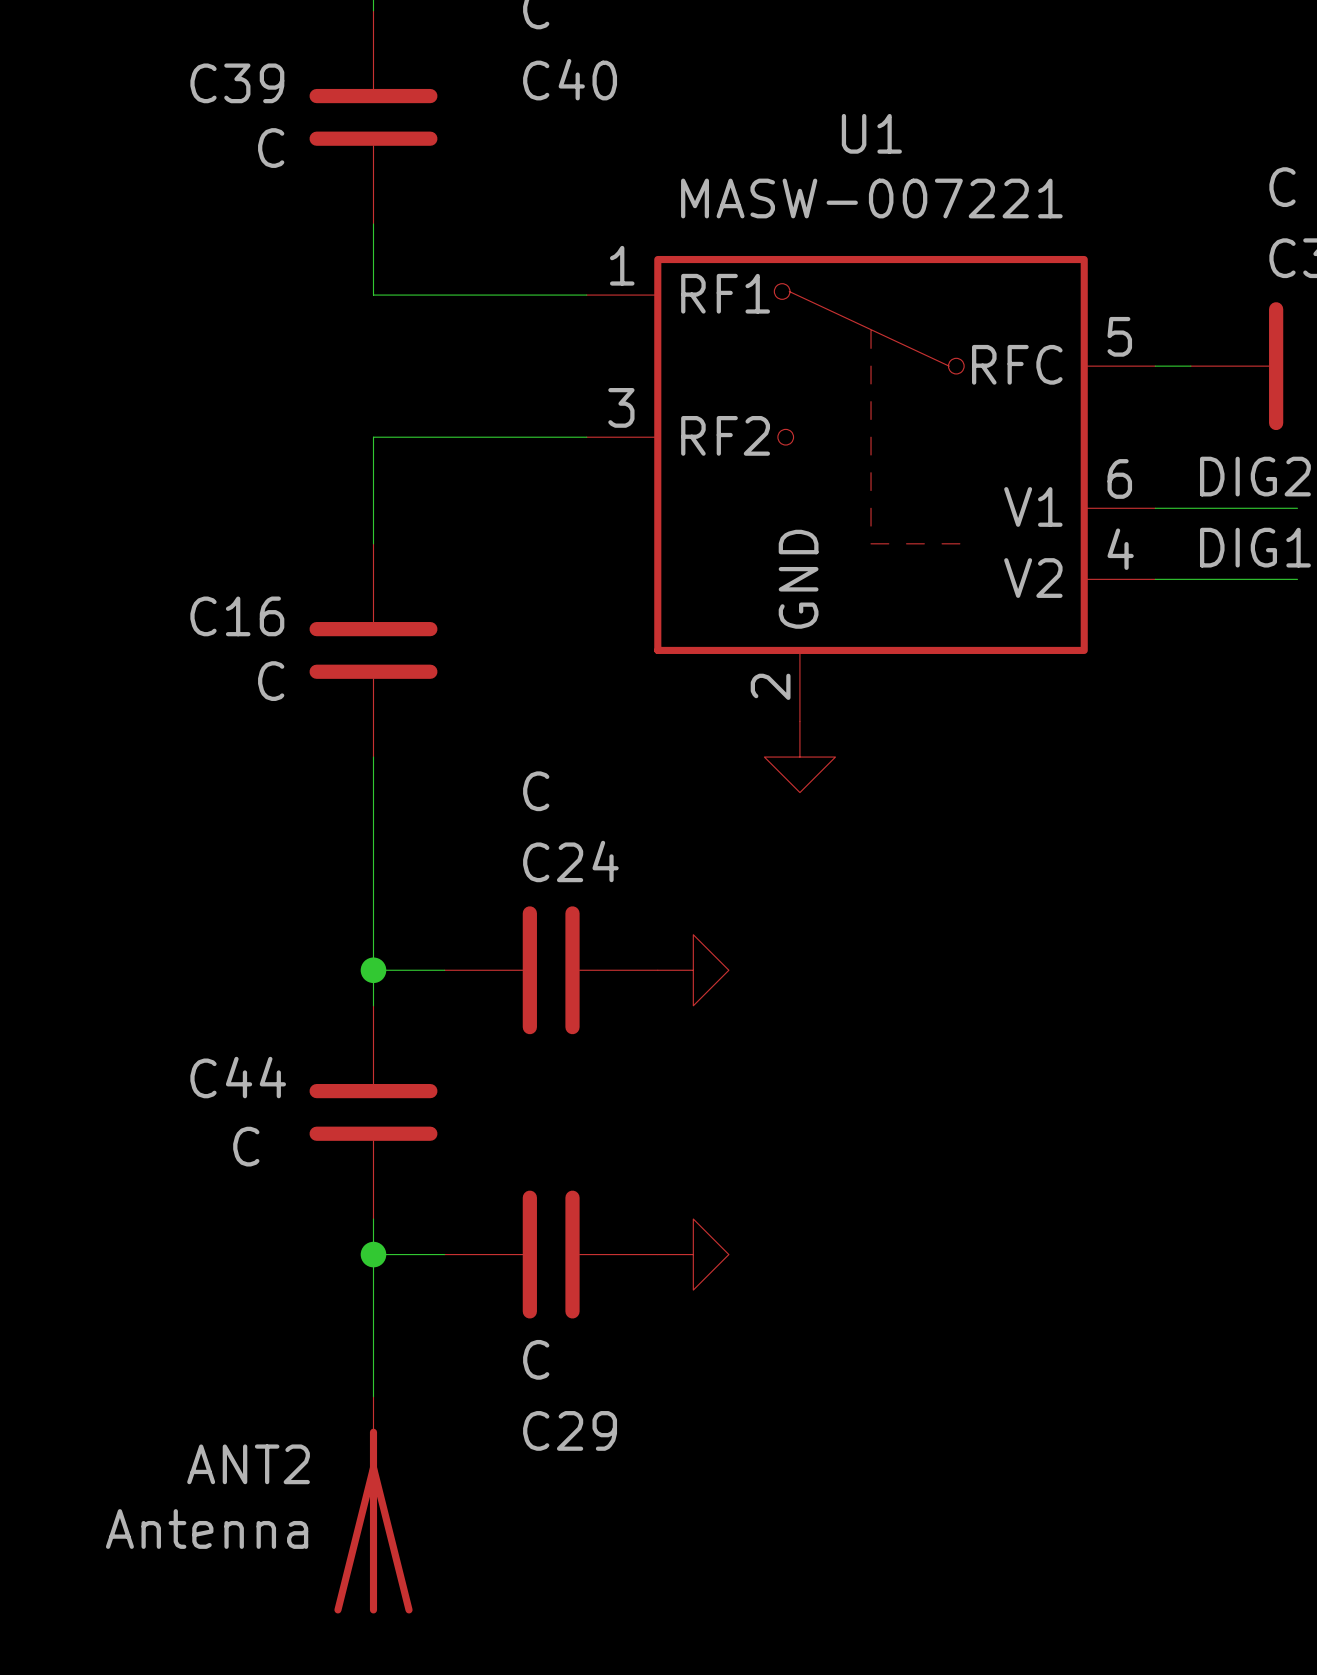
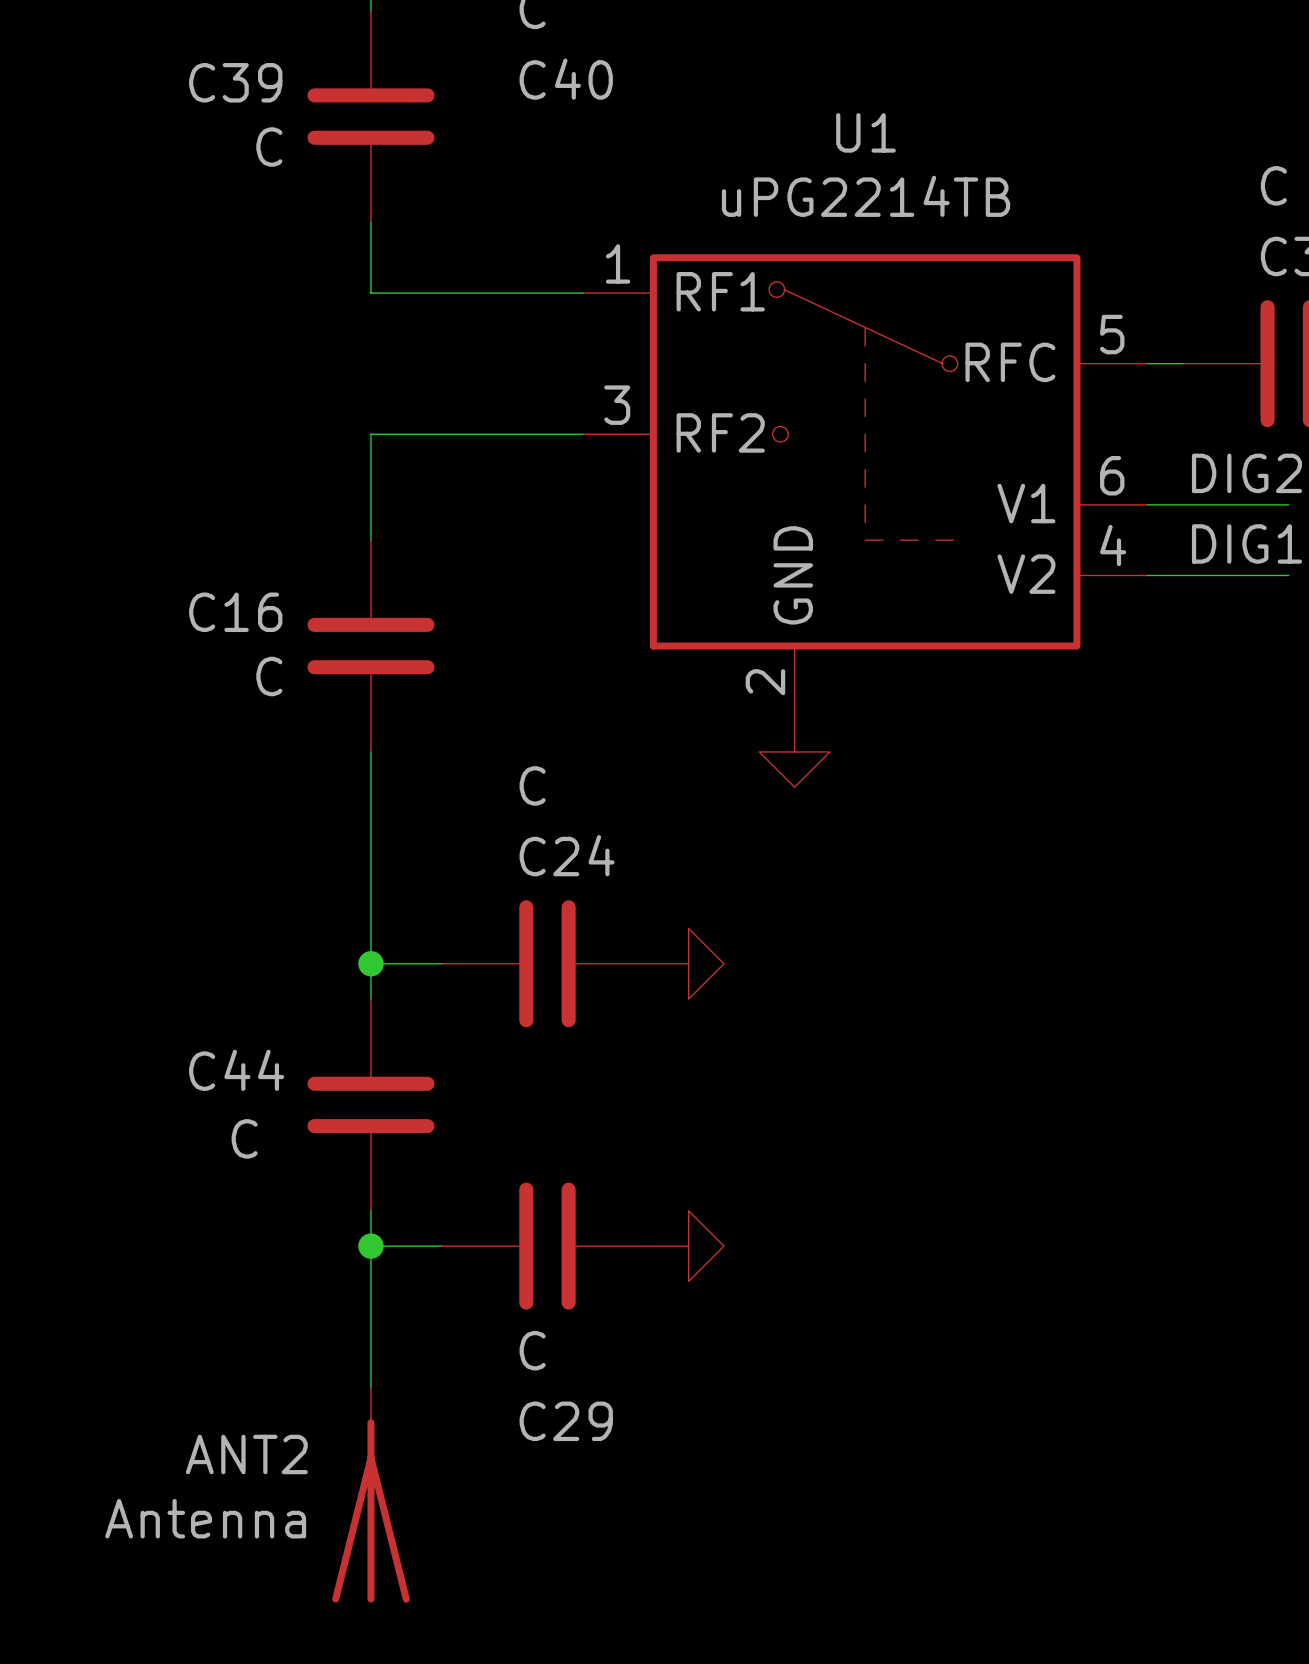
U1 value: MASW-007221 (871, 198) -> uPG2214TB (866, 196)

